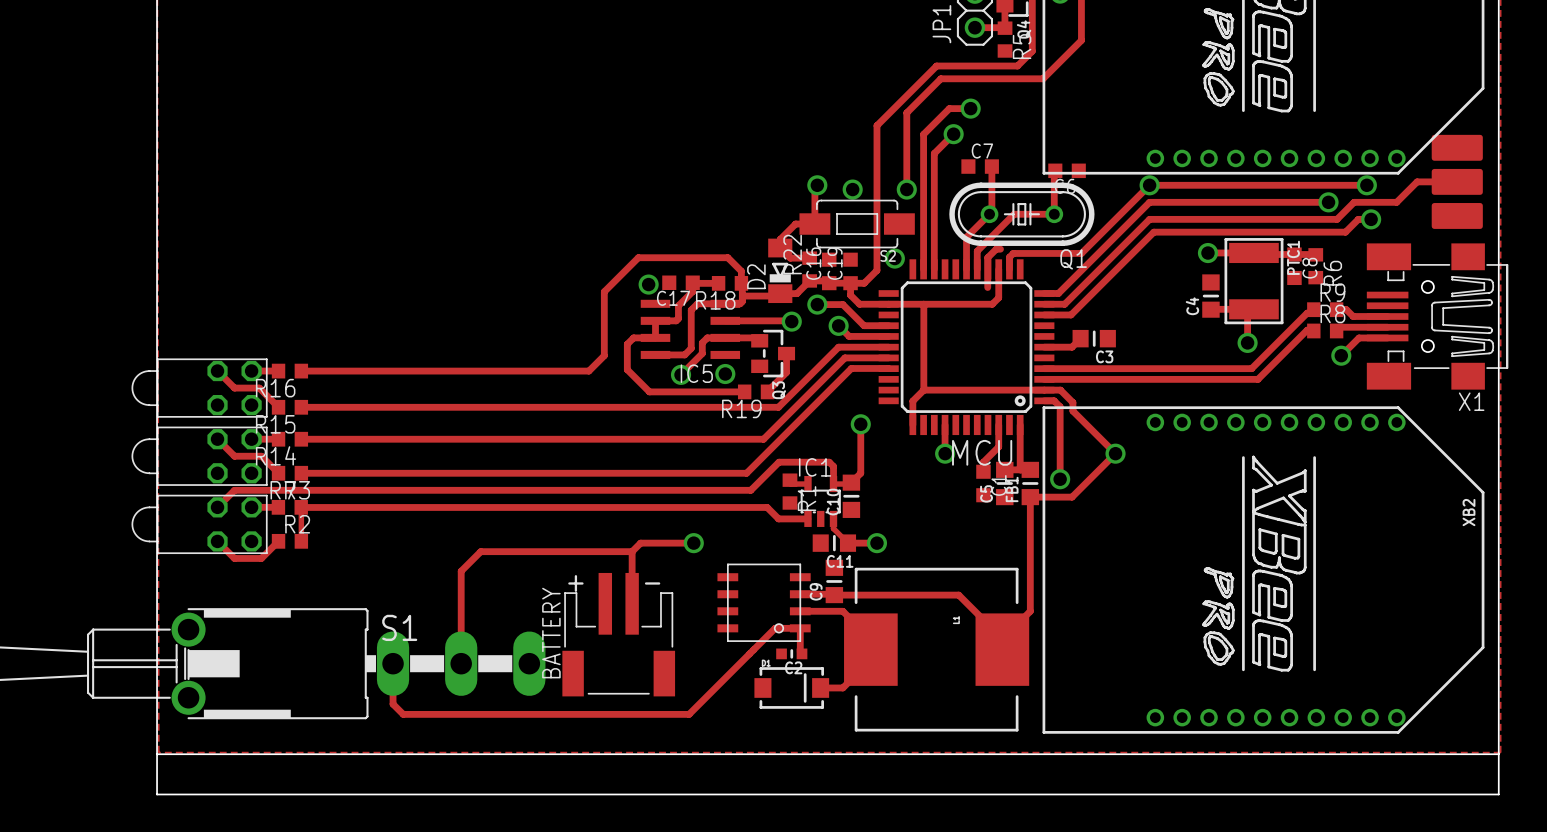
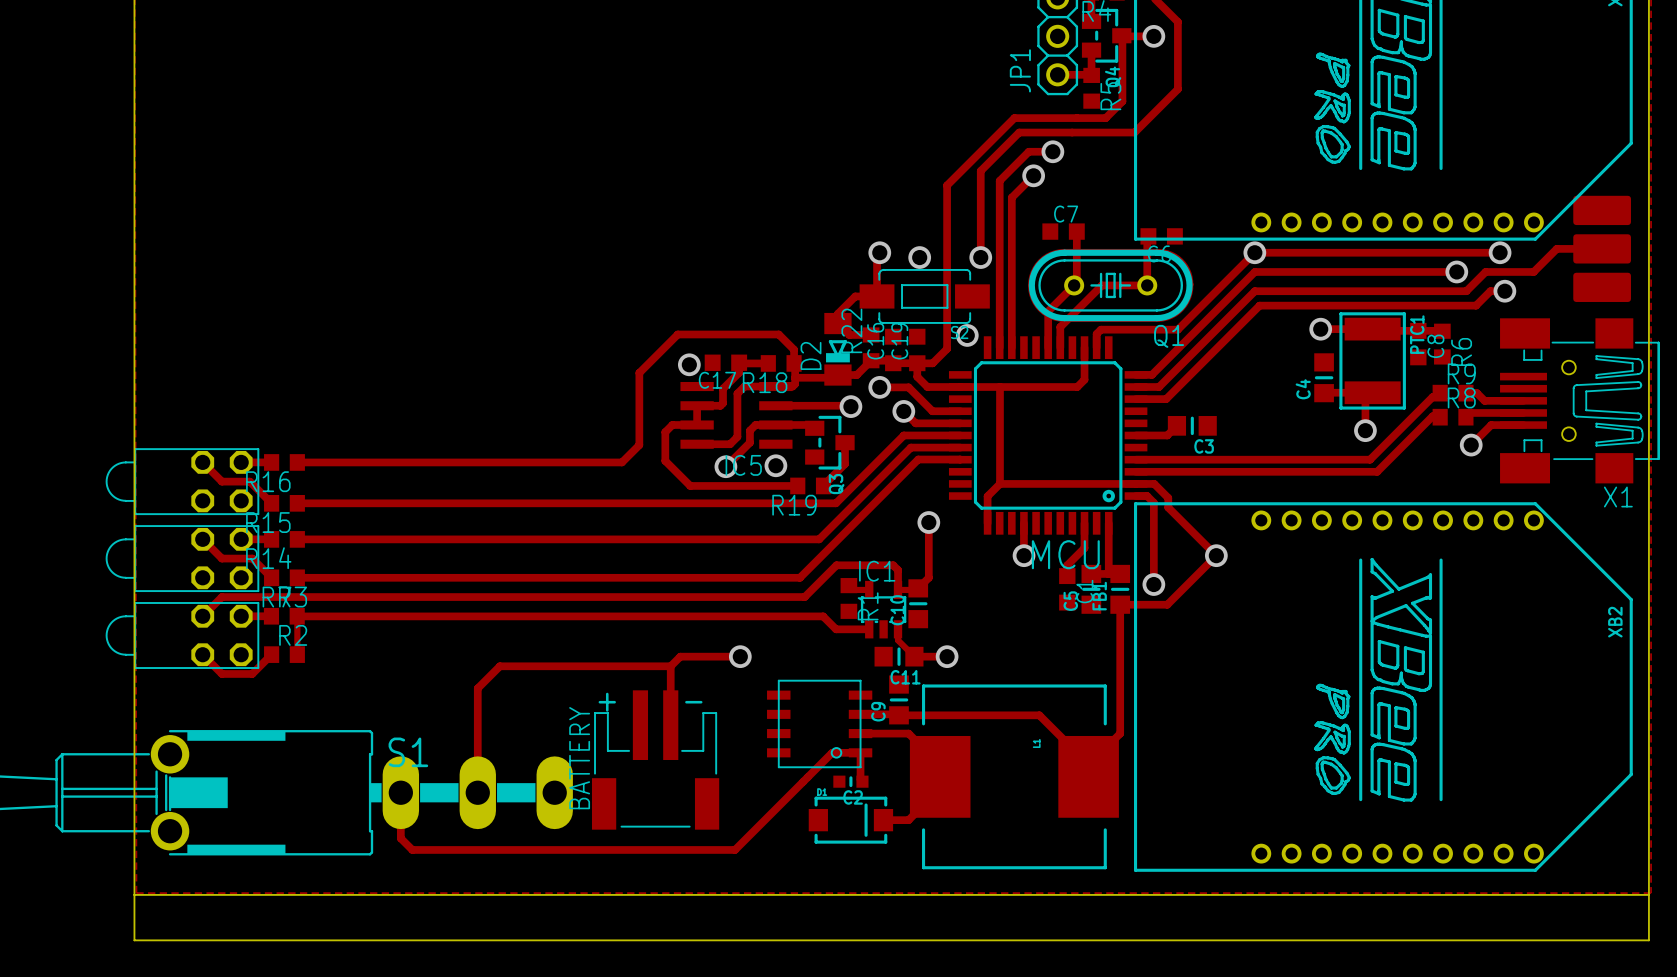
via: none -> (1052, 151)
track: (970, 108) (949, 108) (923, 134) -> (1052, 151) (1028, 151) (999, 180) (999, 195)
via: (970, 108) -> none
via: none -> (1033, 175)
track: (953, 134) (934, 153) -> (1033, 175) (1011, 197) (1011, 216)
via: (953, 134) -> none
track: none -> (1192, 284) (1190, 297) (1183, 309) (1172, 317) (1158, 321) (1055, 319) (1042, 313) (1036, 307) (1030, 295) (1028, 285) (1031, 271) (1039, 260) (1050, 252) (1064, 249) (1168, 251) (1184, 262) (1190, 272) (1192, 284)
track: (1000, 249) (996, 249) (987, 257) (987, 287) -> none

